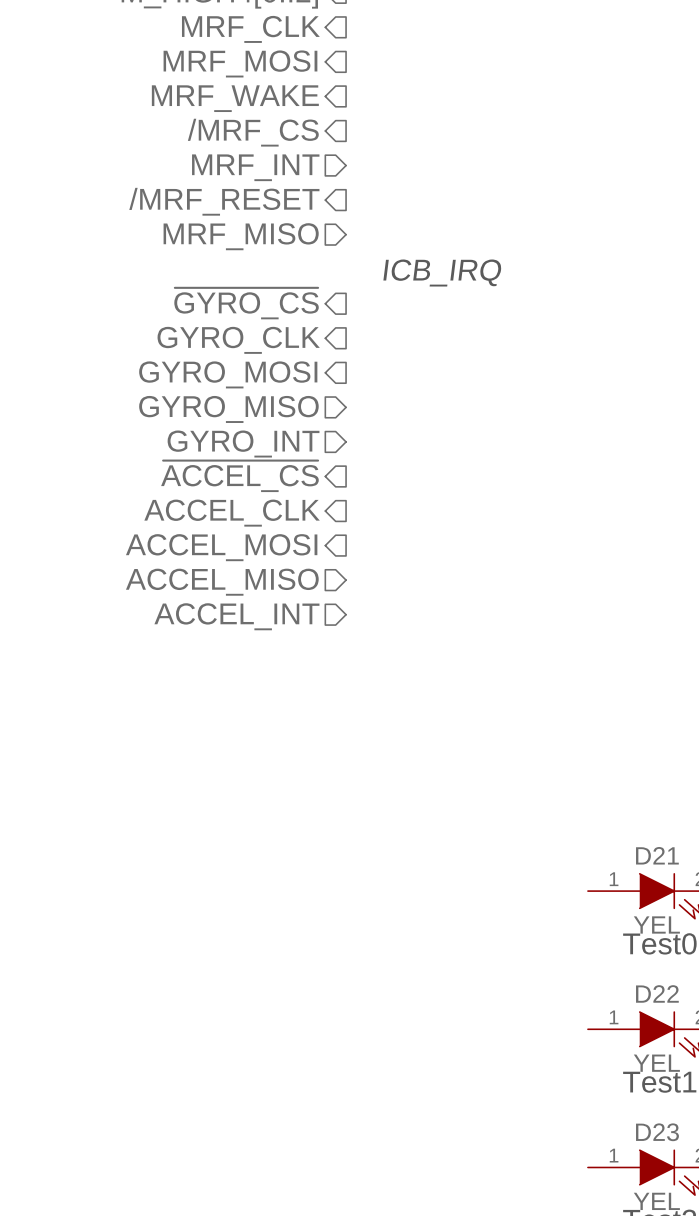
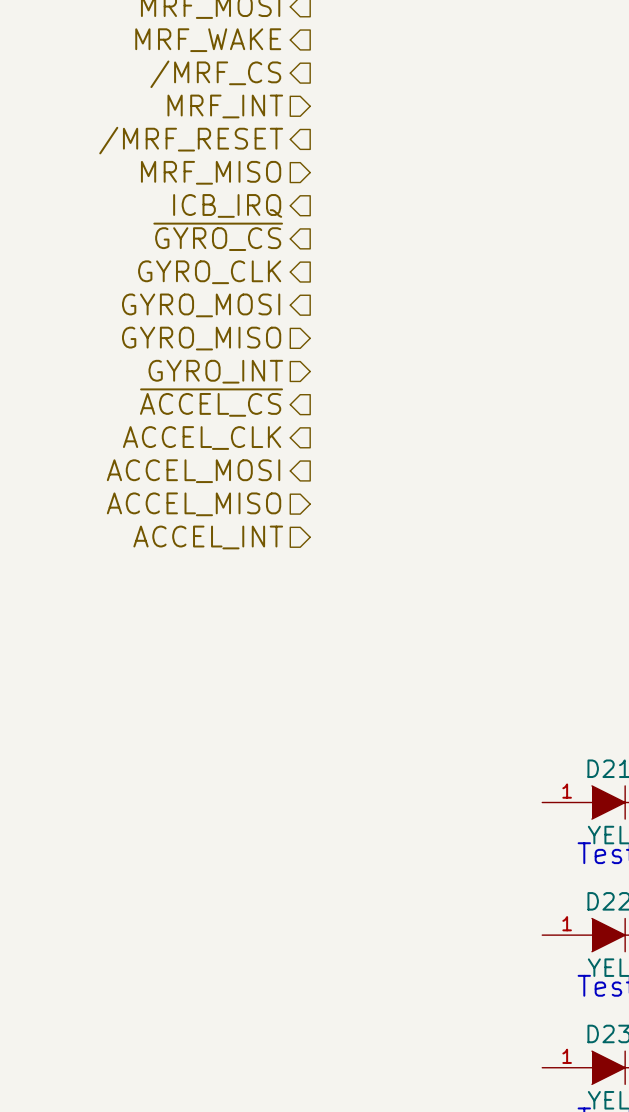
hierarchical label: none -> ICB_IRQ (227, 205)
text: ICB_IRQ (442, 273) -> none

